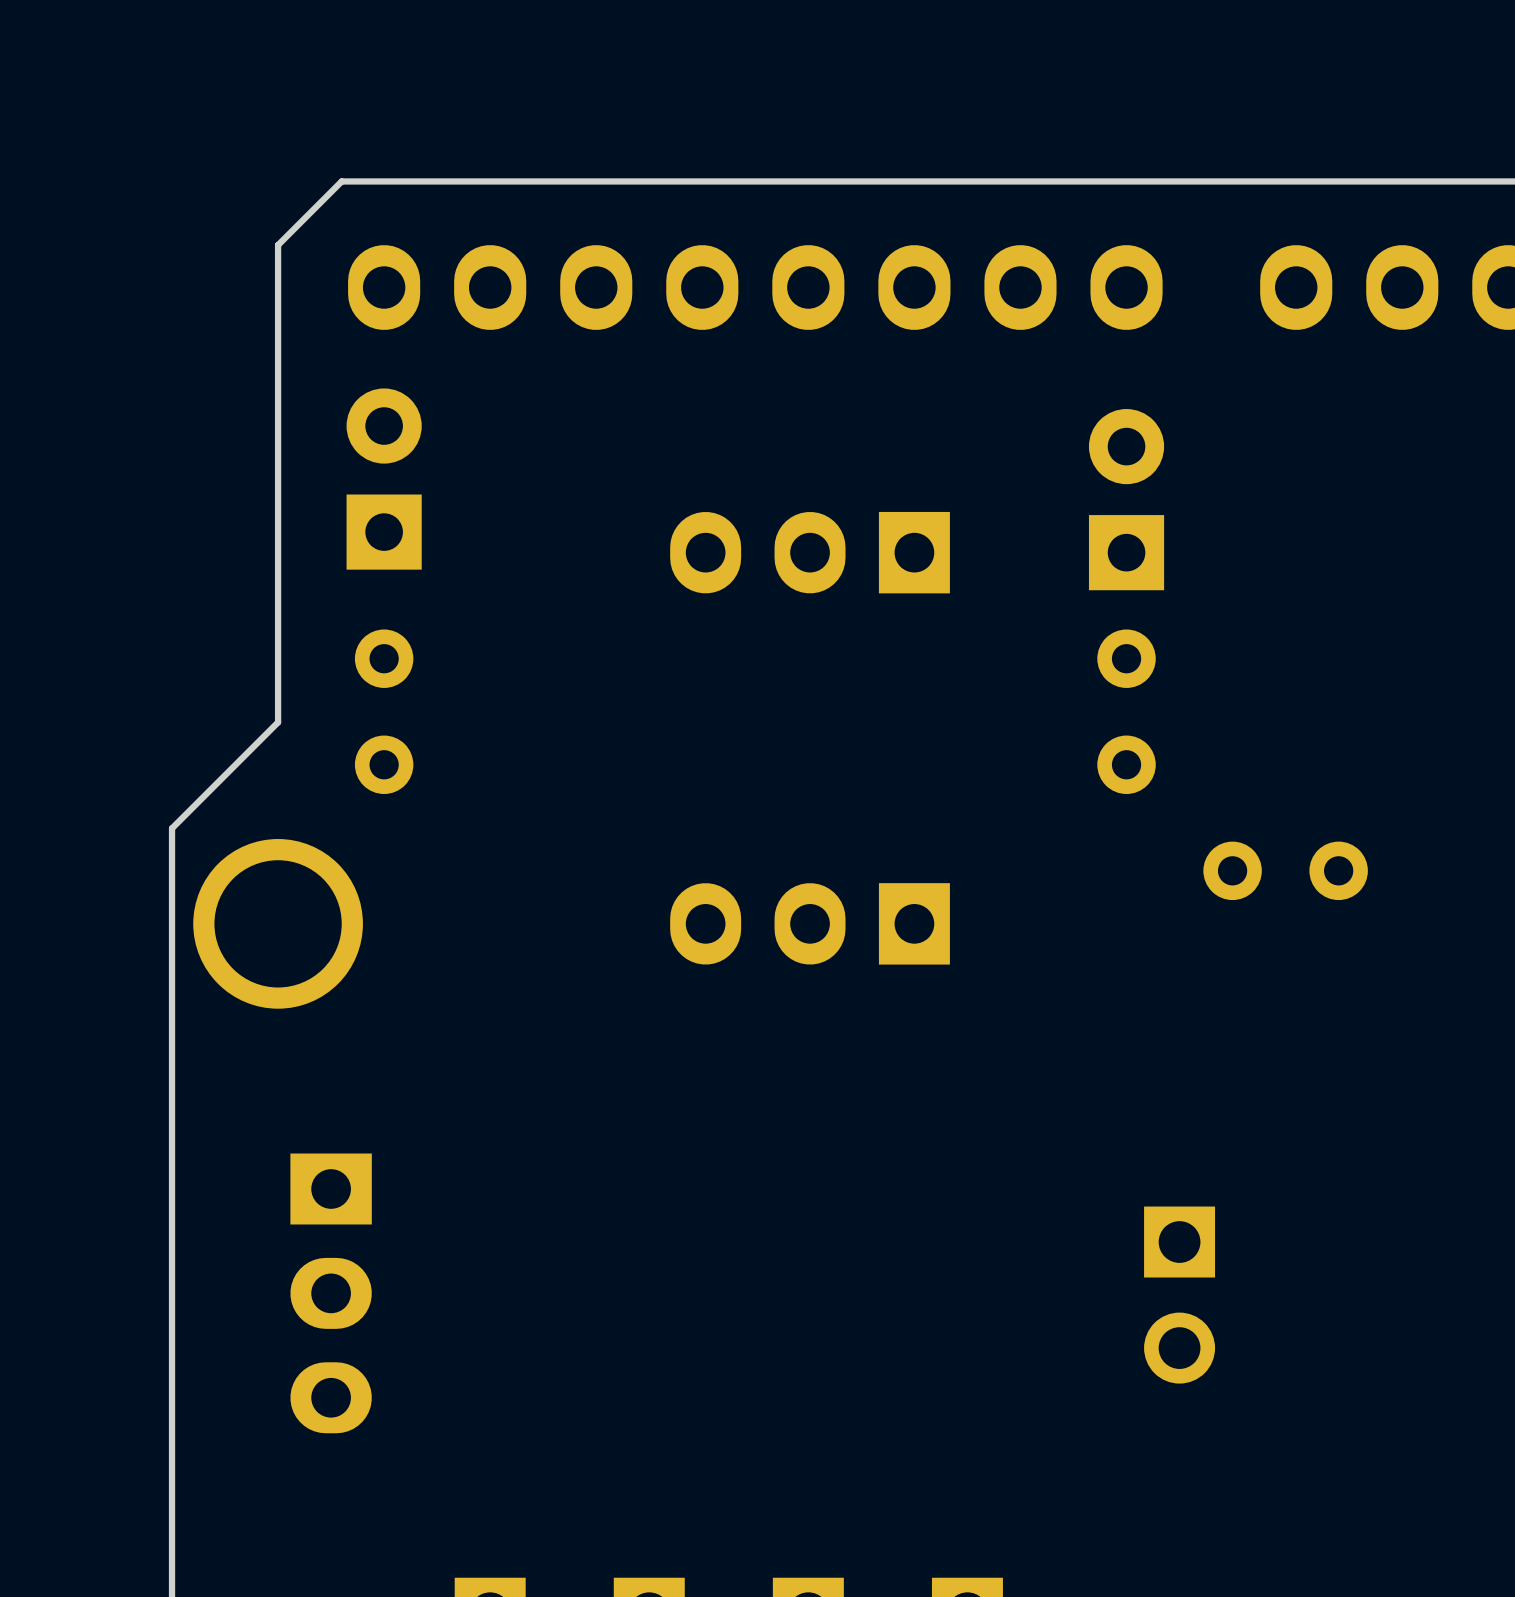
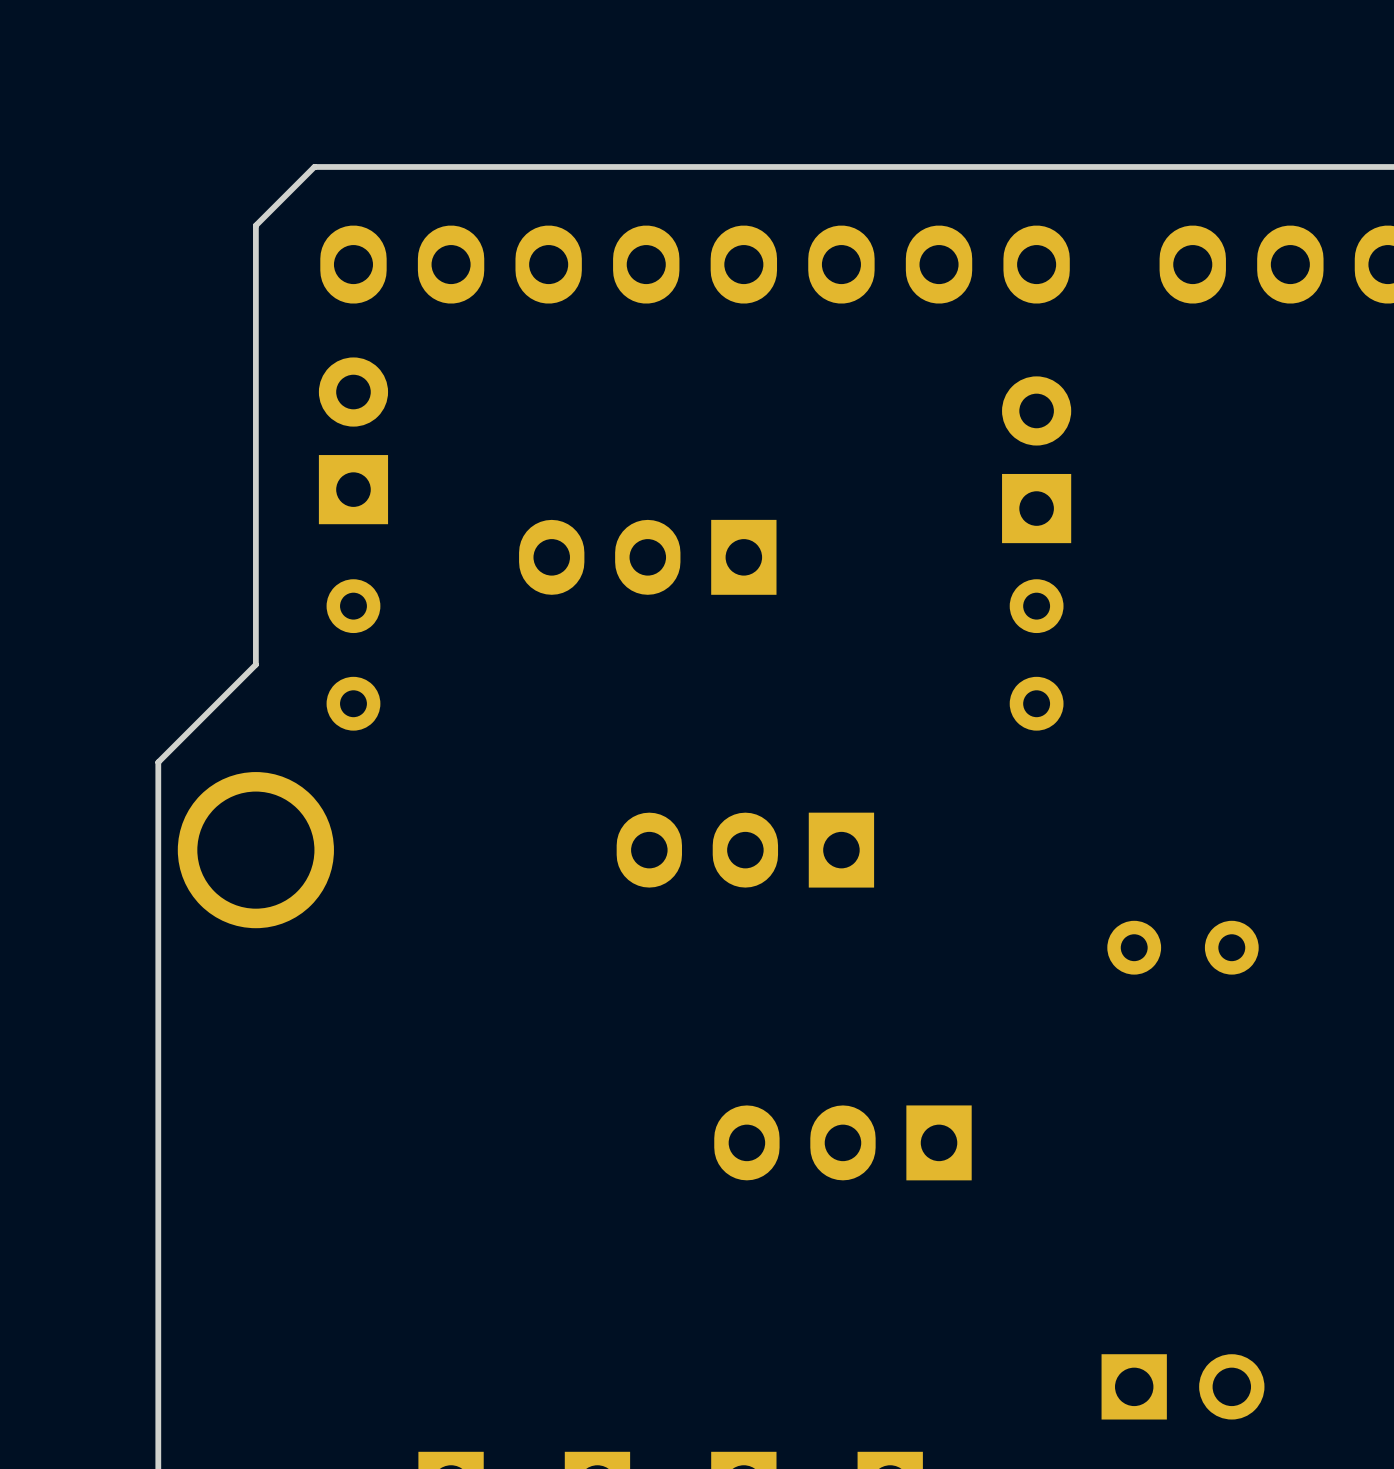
part position: (810, 552) -> (647, 557)
part position: (1285, 870) -> (1183, 947)
part: none -> (842, 1142)
part: (331, 1293) -> none
part rotation: 0° (1179, 1295) -> 90° counterclockwise (1183, 1386)
part position: (1179, 1295) -> (1183, 1386)

